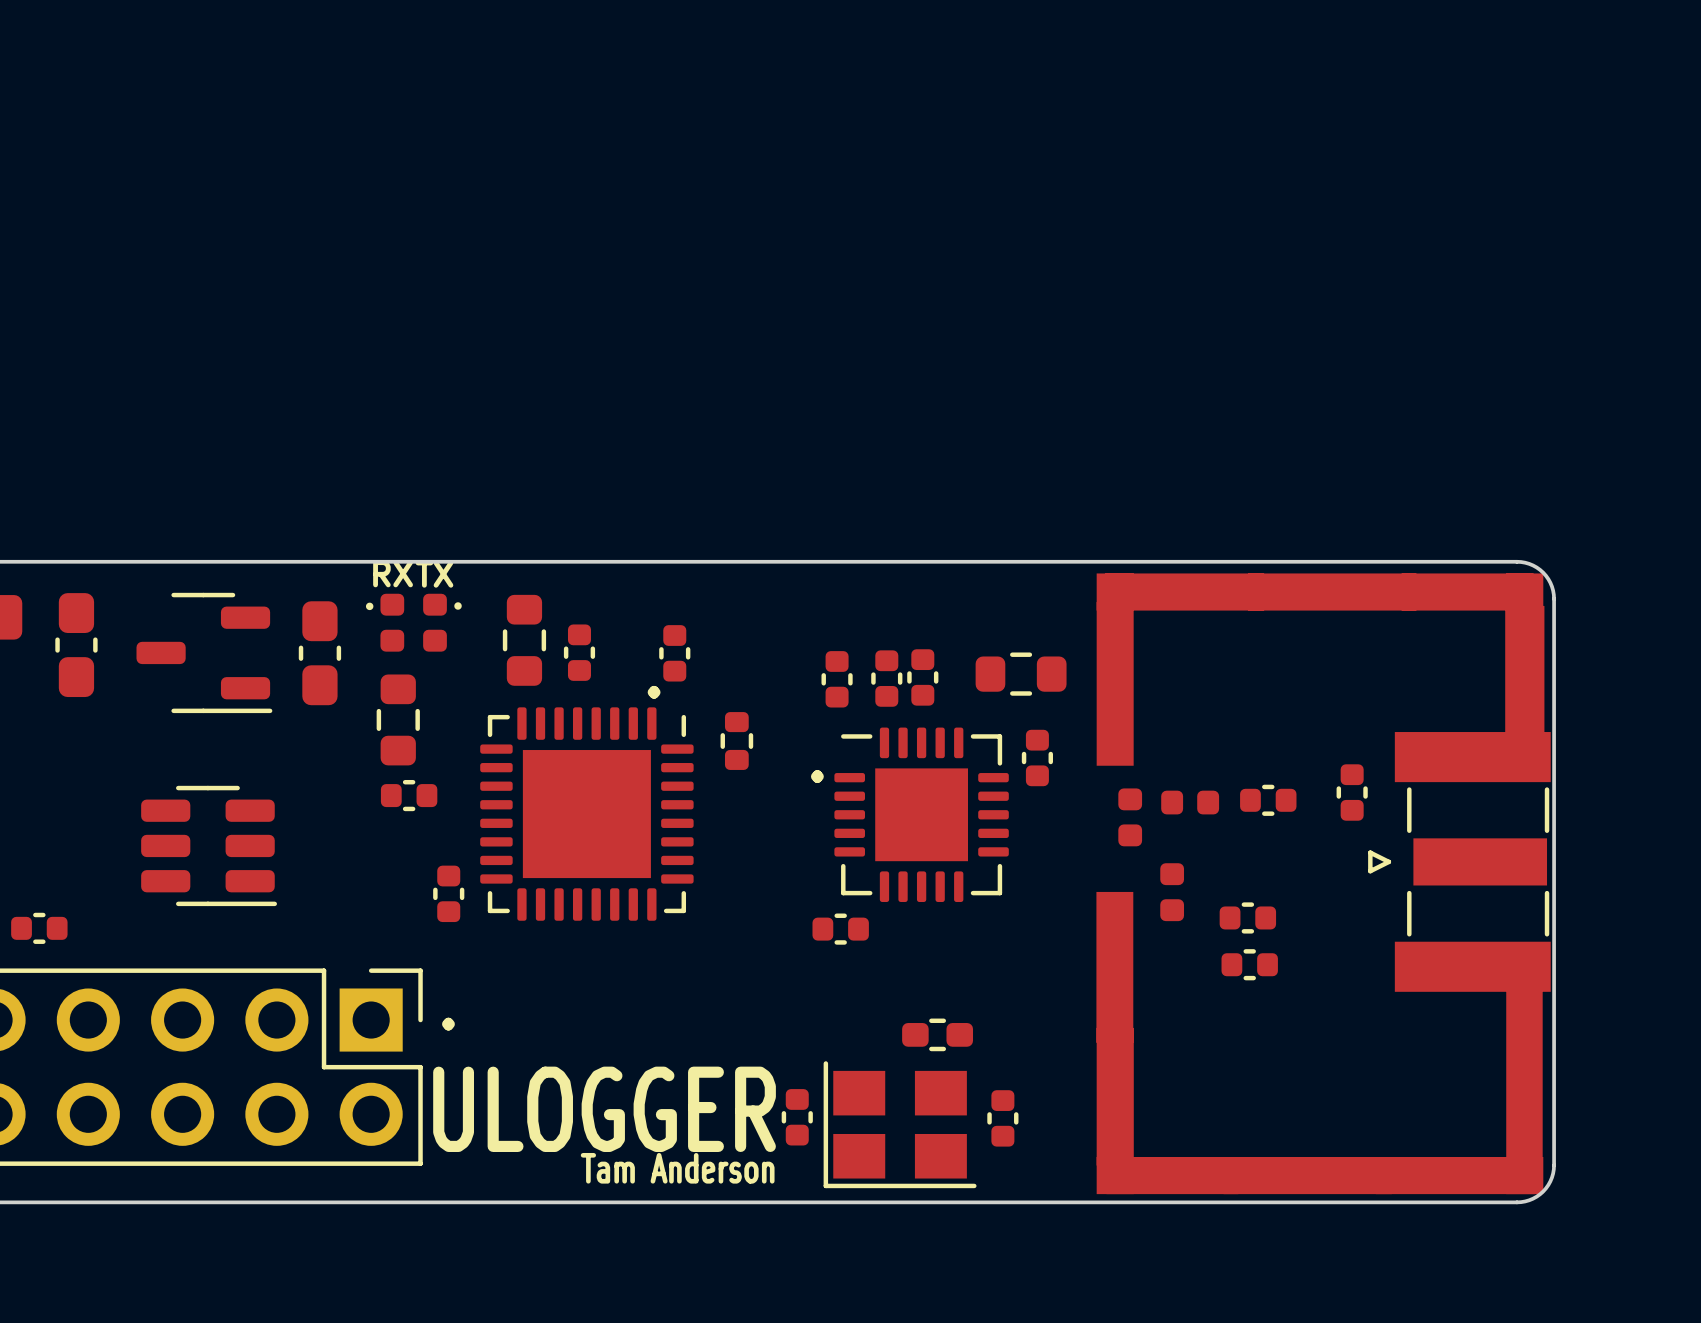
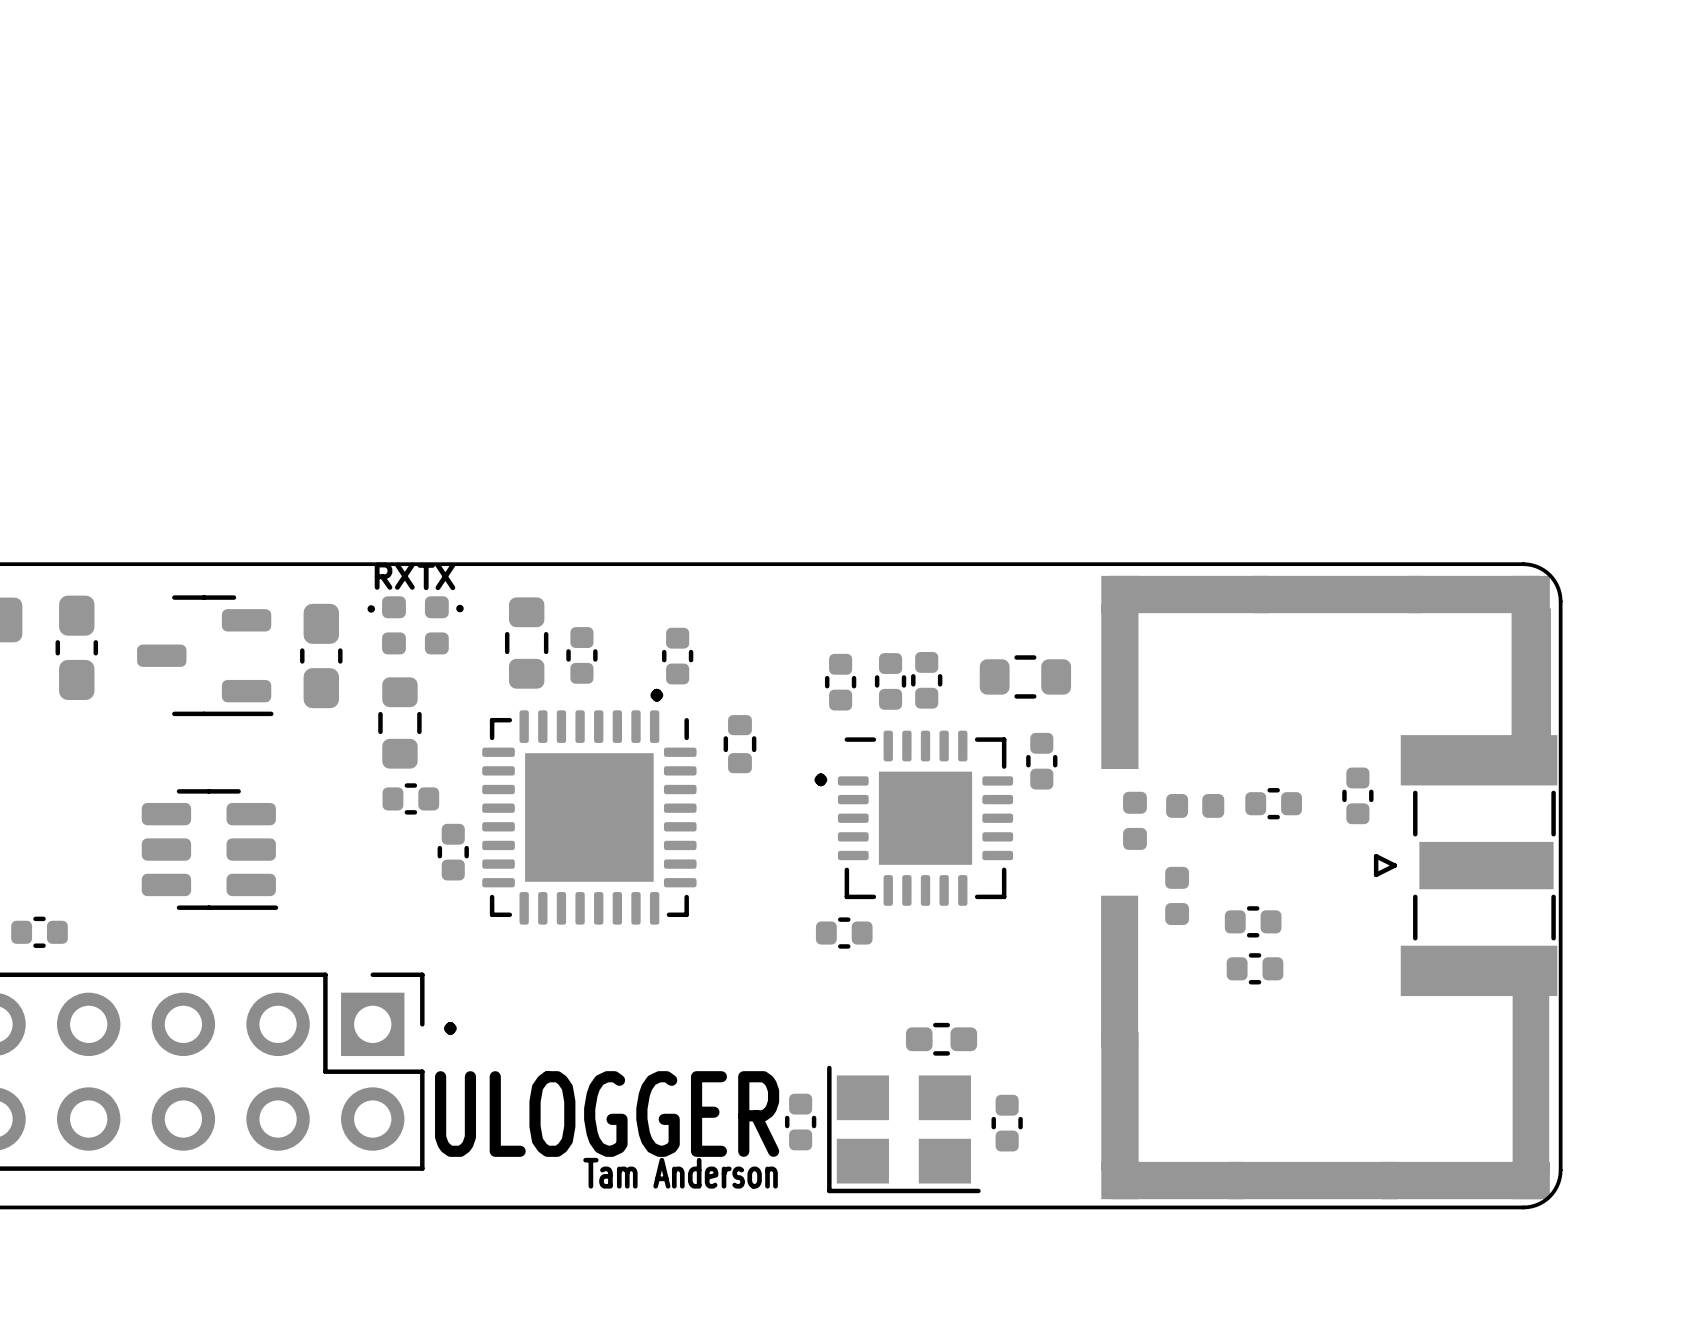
part position: (448, 893) -> (453, 852)

